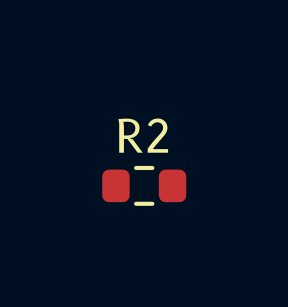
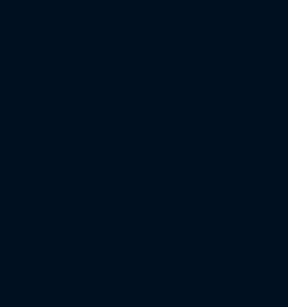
R2: (144, 185) -> none

